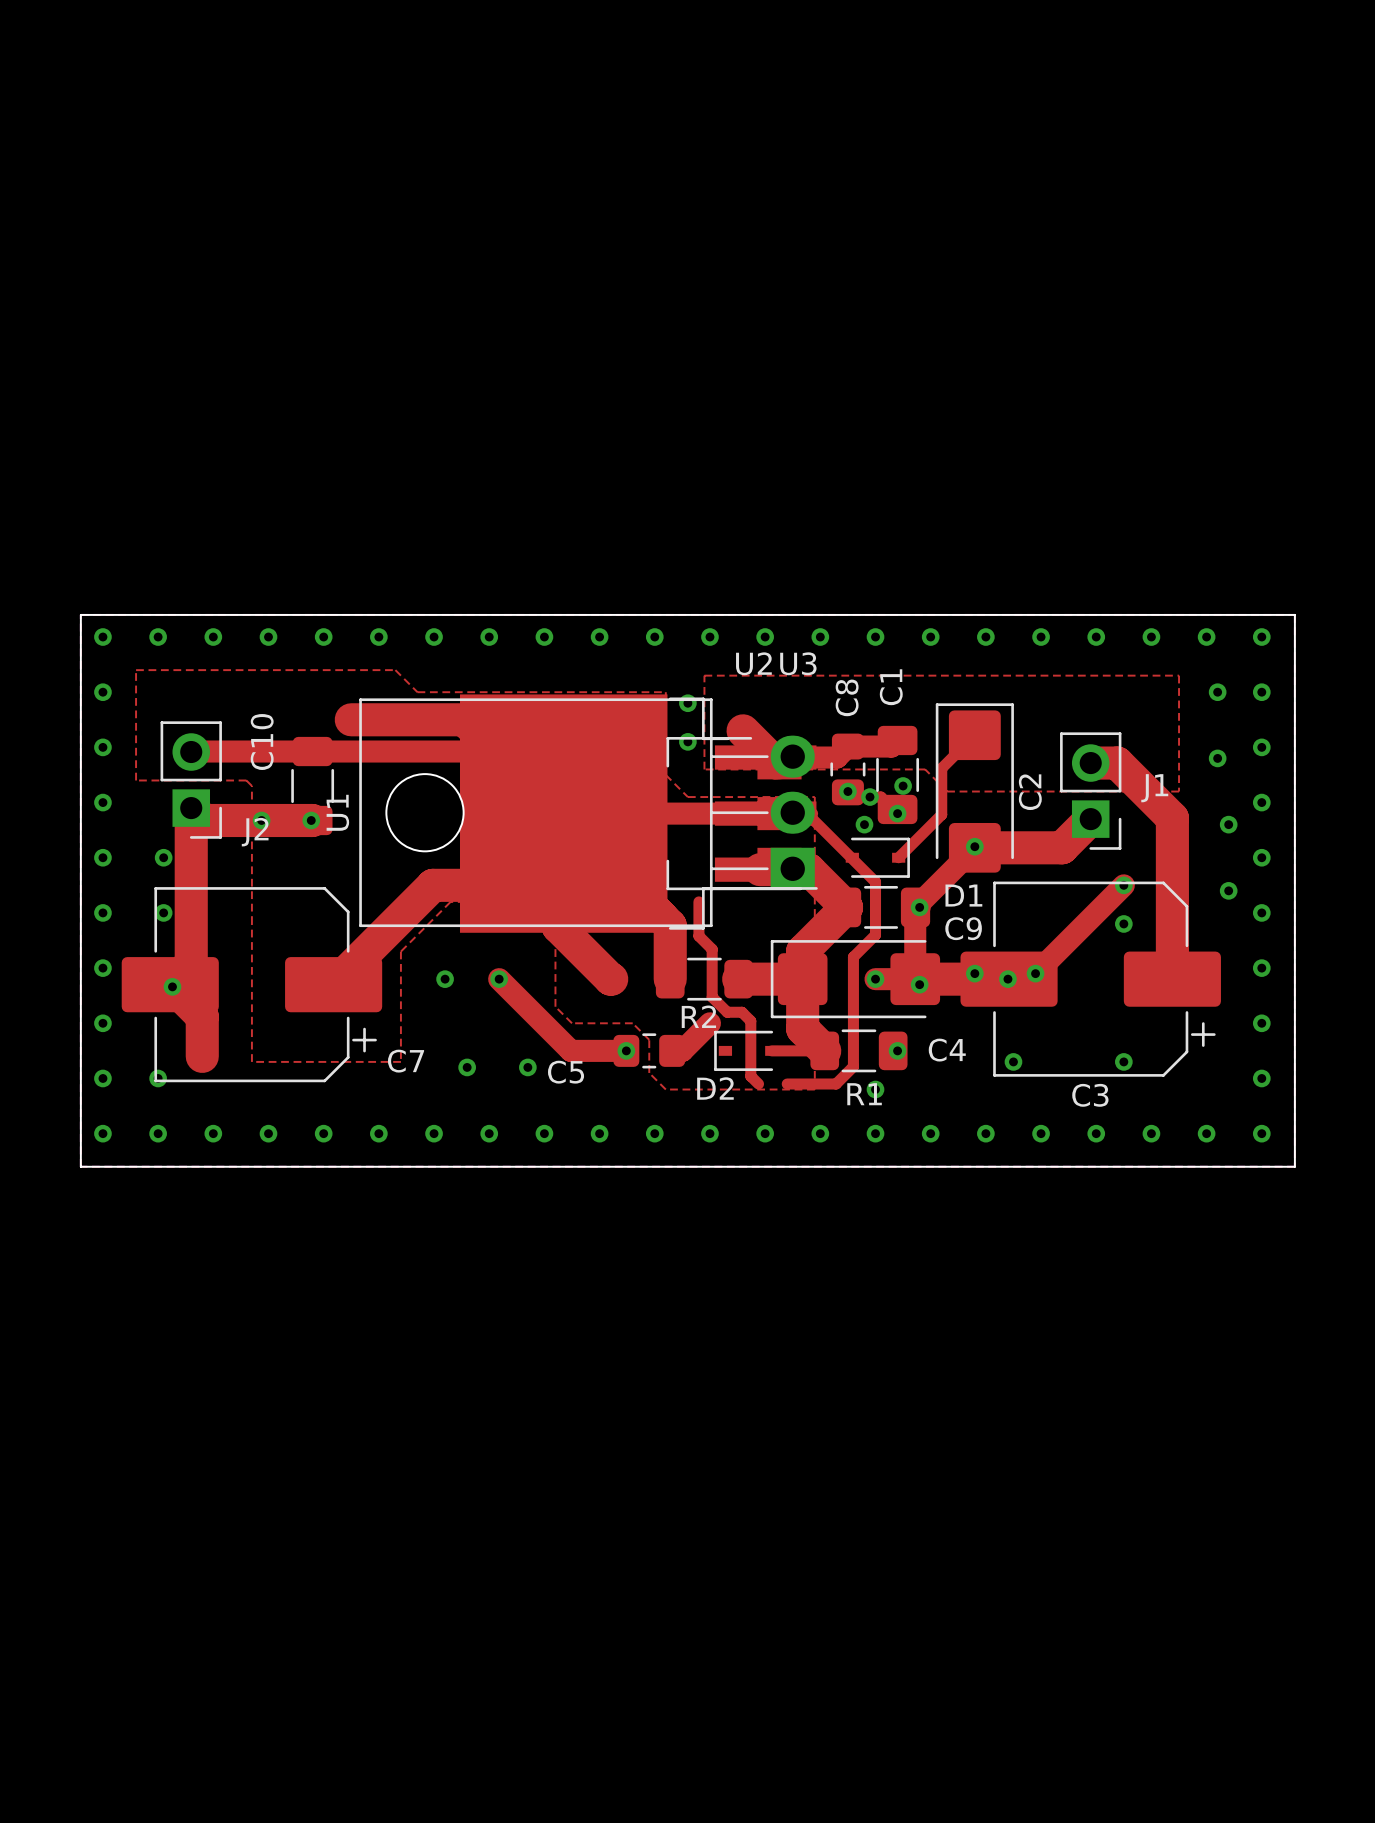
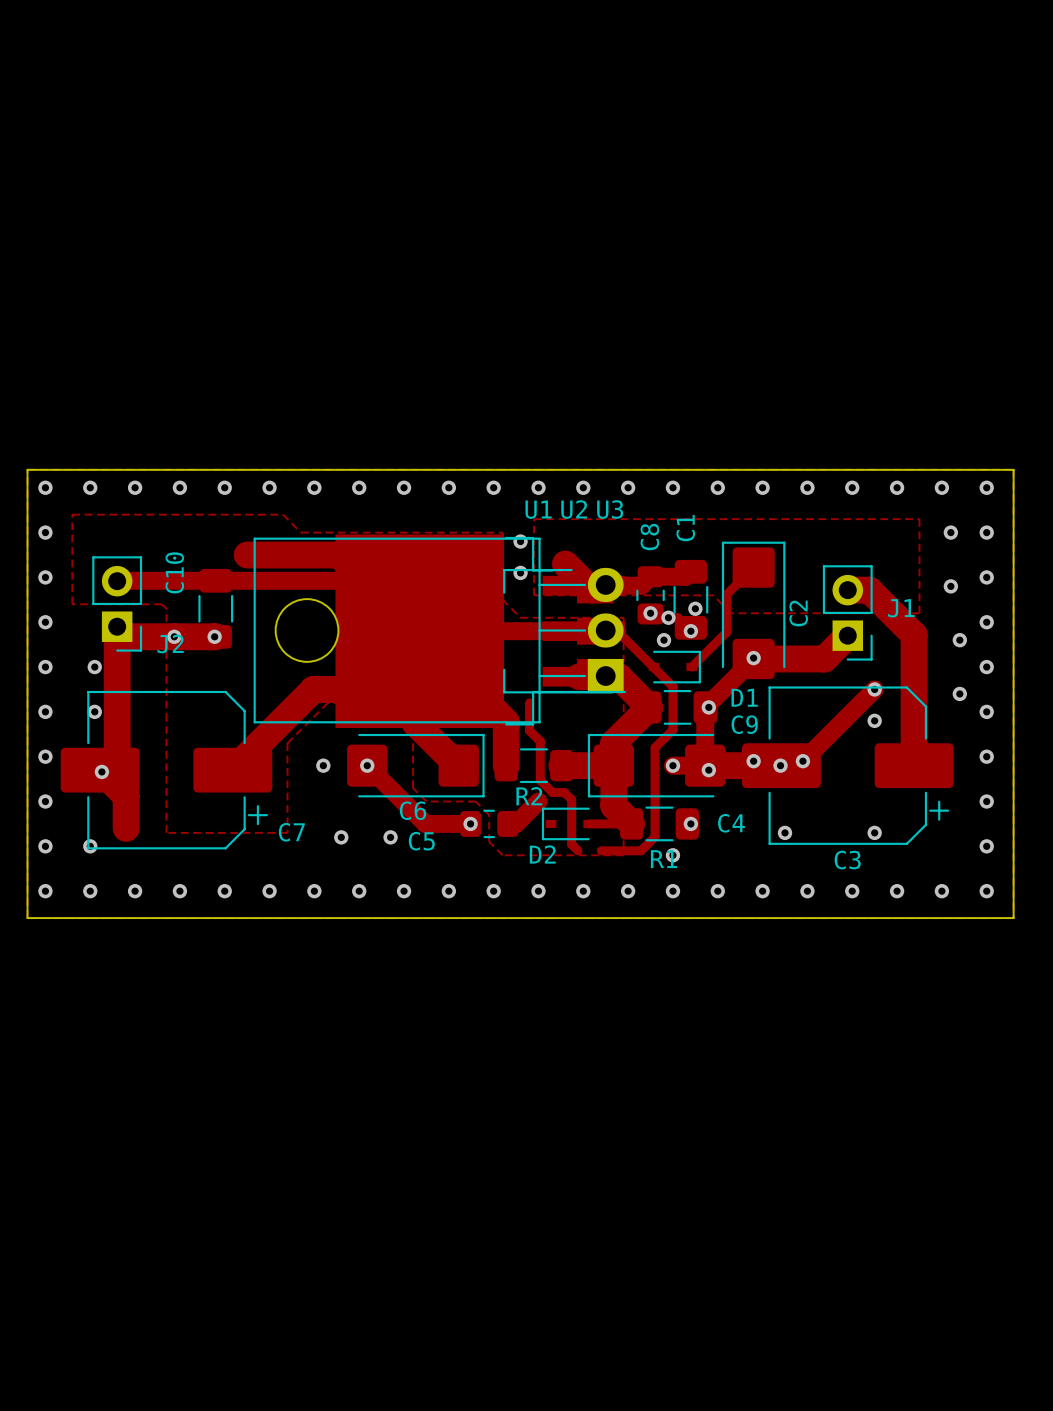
U1 name rotation: 0° (337, 812) -> 90° clockwise (538, 509)
U1 name position: U1 (337, 812) -> U1 (538, 509)
C6: none -> (415, 765)

